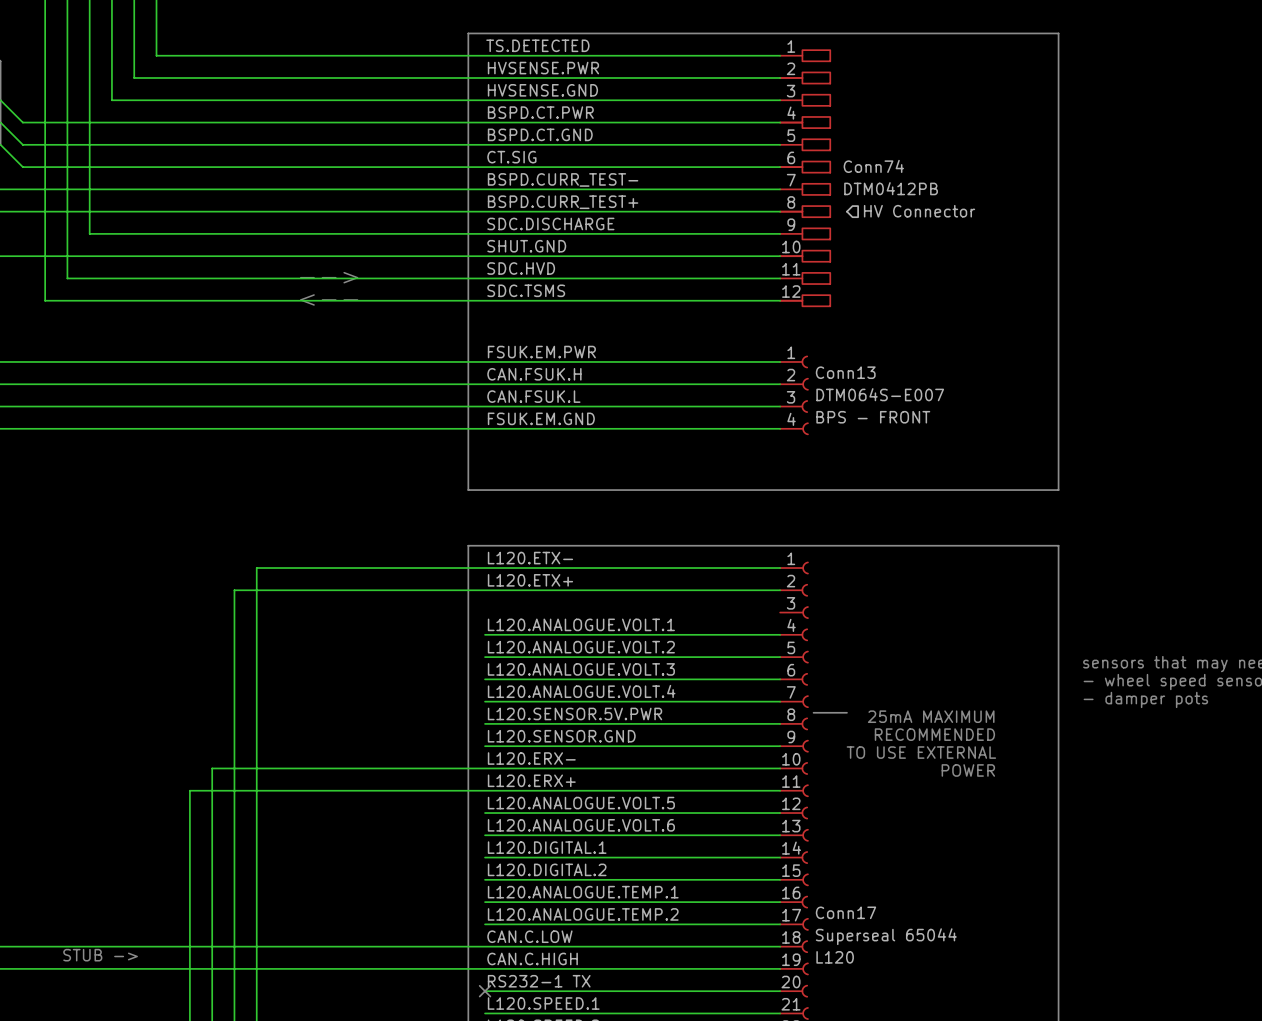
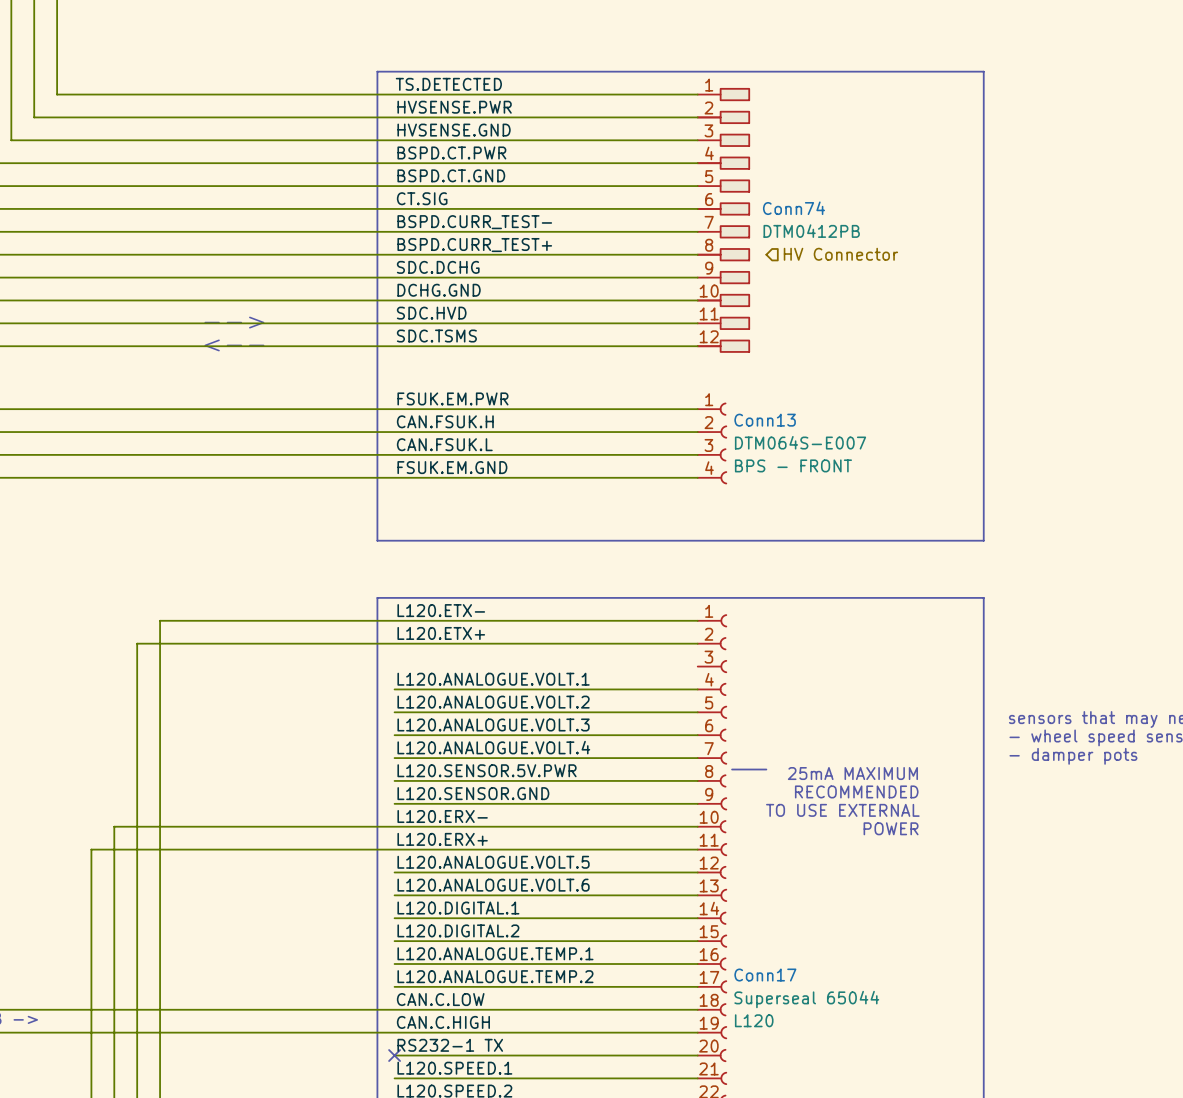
label: SDC.DISCHARGE (550, 223) -> SDC.DCHG (438, 267)
label: SHUT.GND (526, 246) -> DCHG.GND (439, 290)

